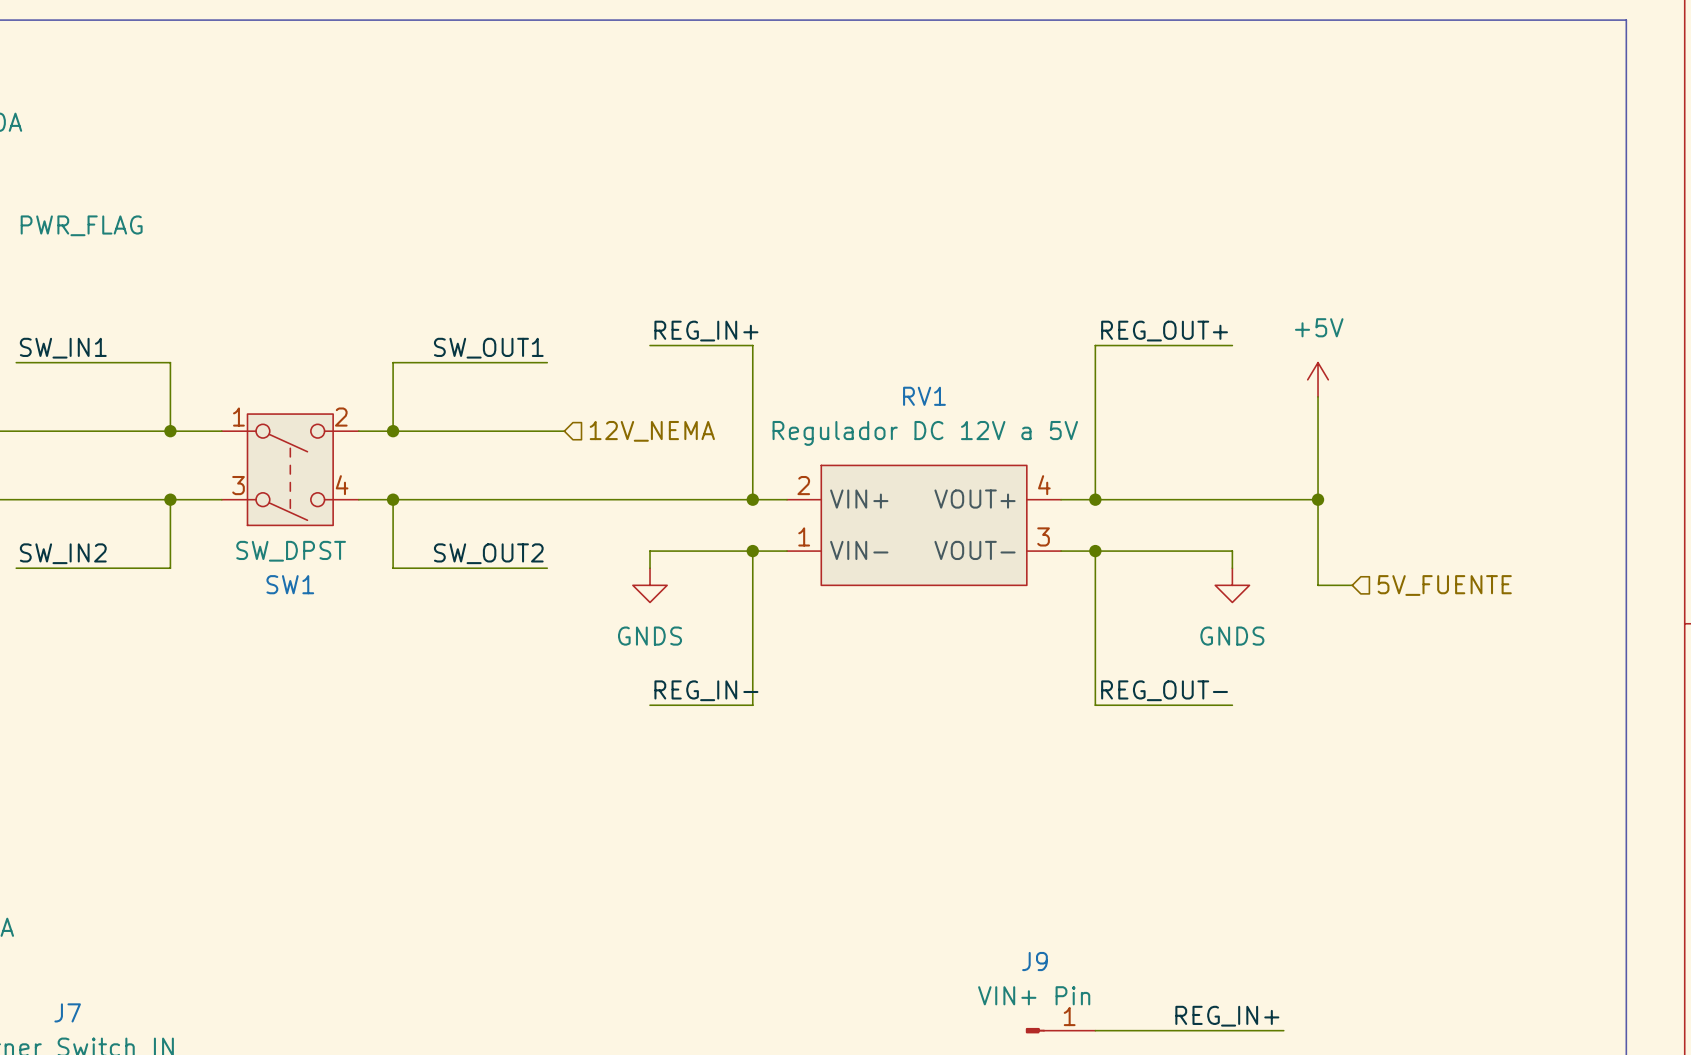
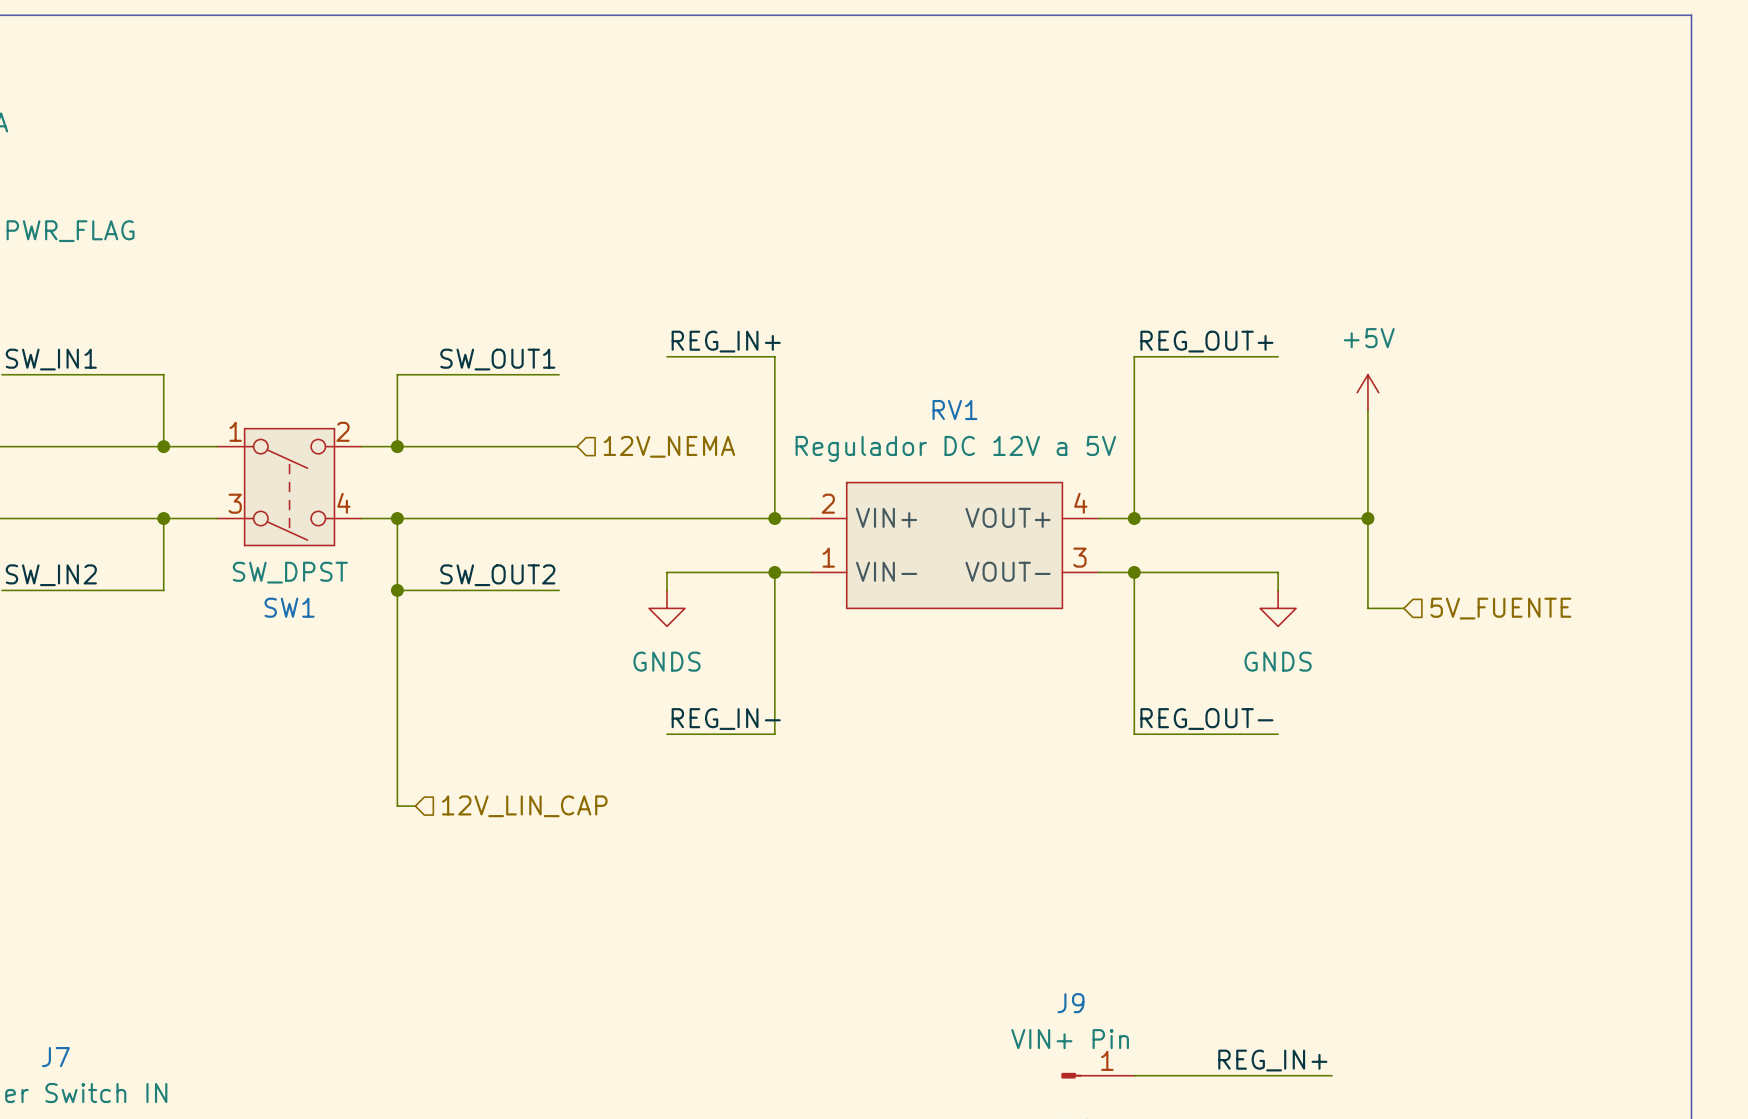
wire: none -> (397, 590) (397, 806) (415, 806)
junction: none -> (397, 590)
hierarchical label: none -> 12V_LIN_CAP (524, 806)

